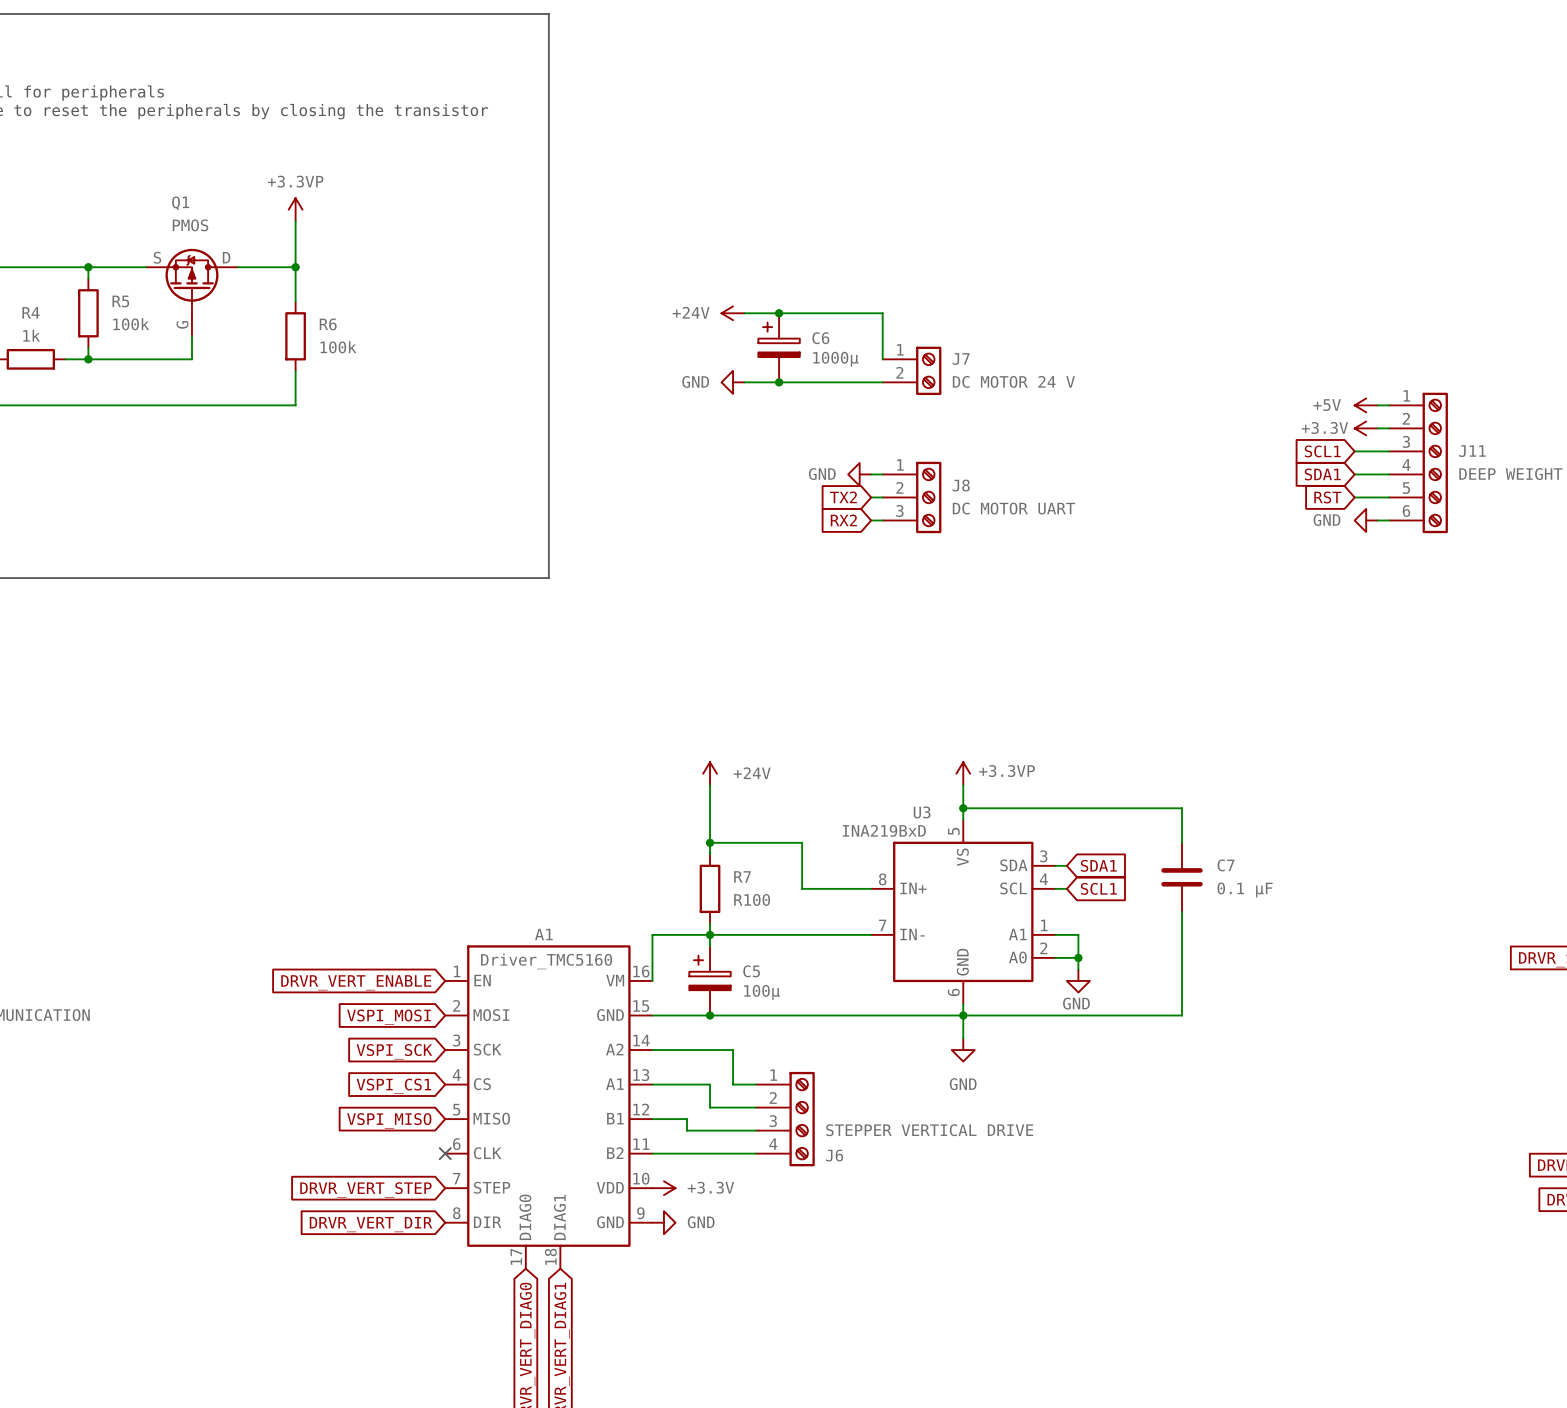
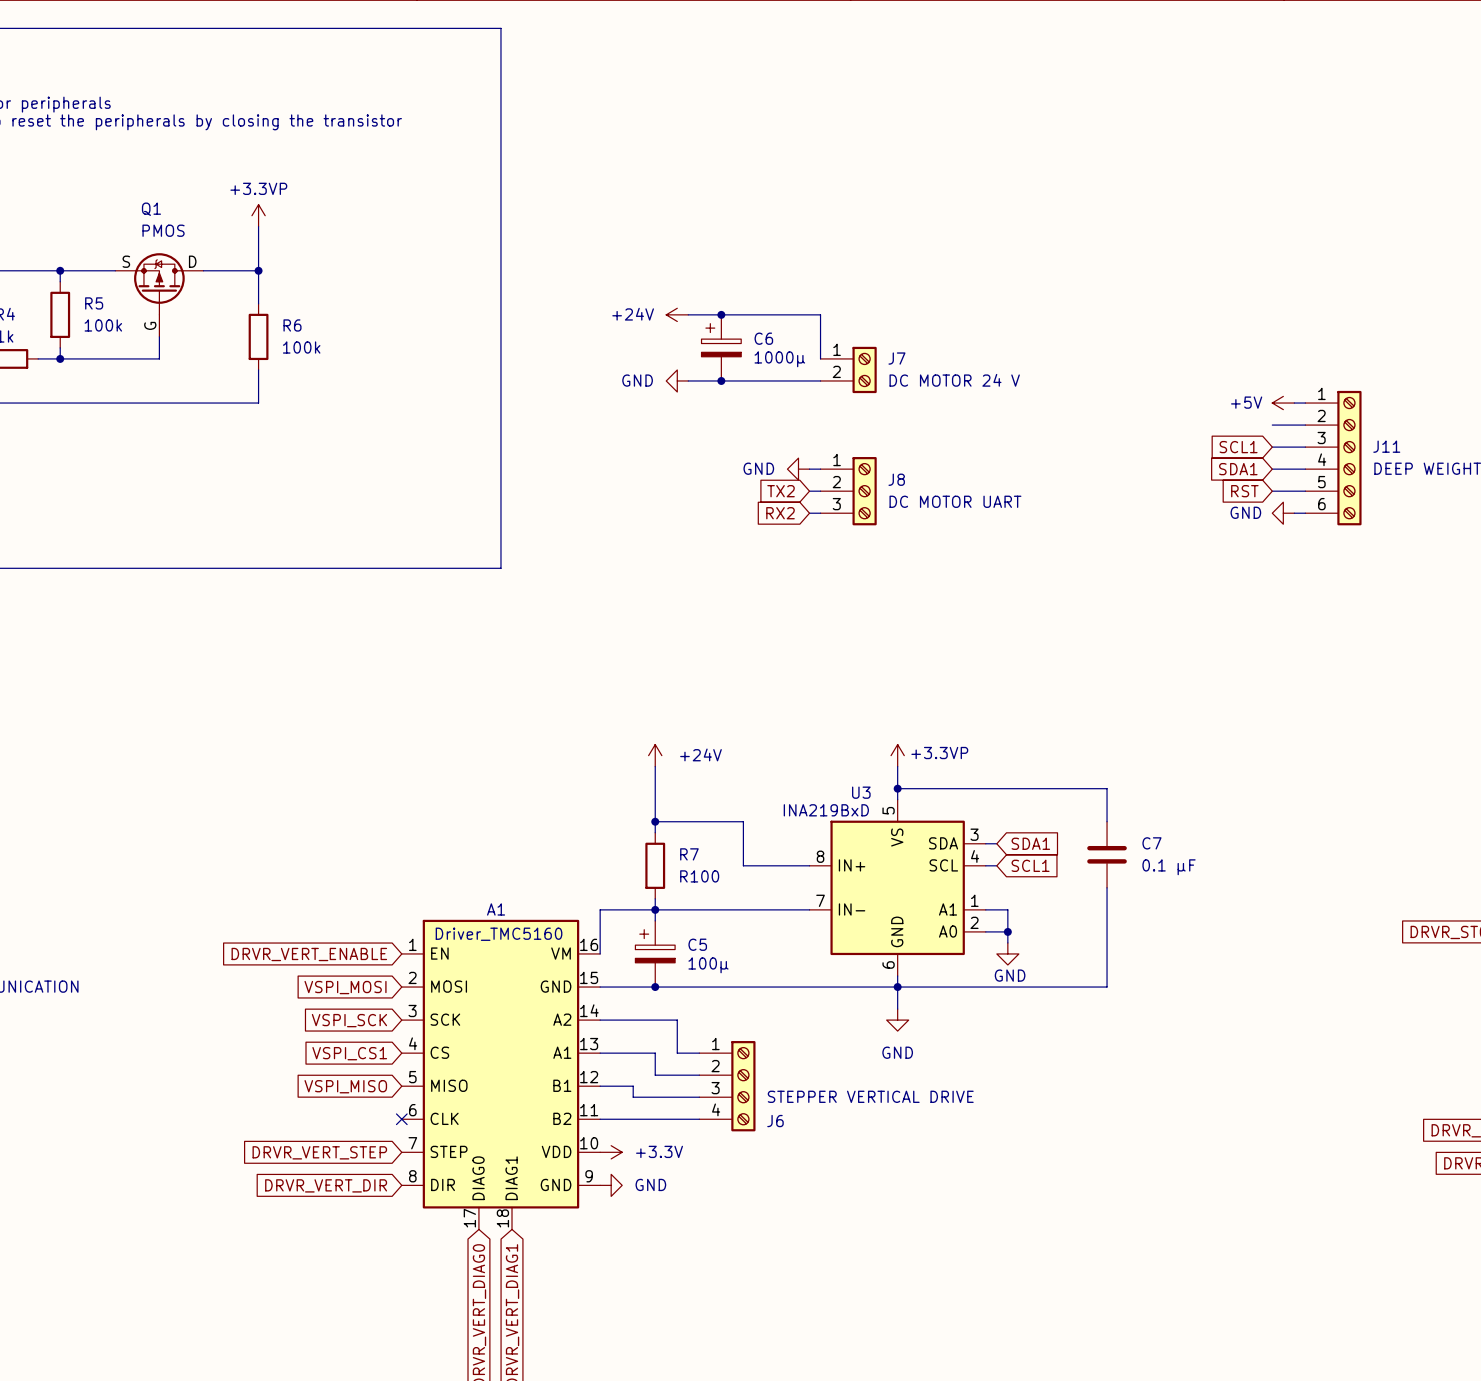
power symbol: +3.3V (1366, 428) -> none

